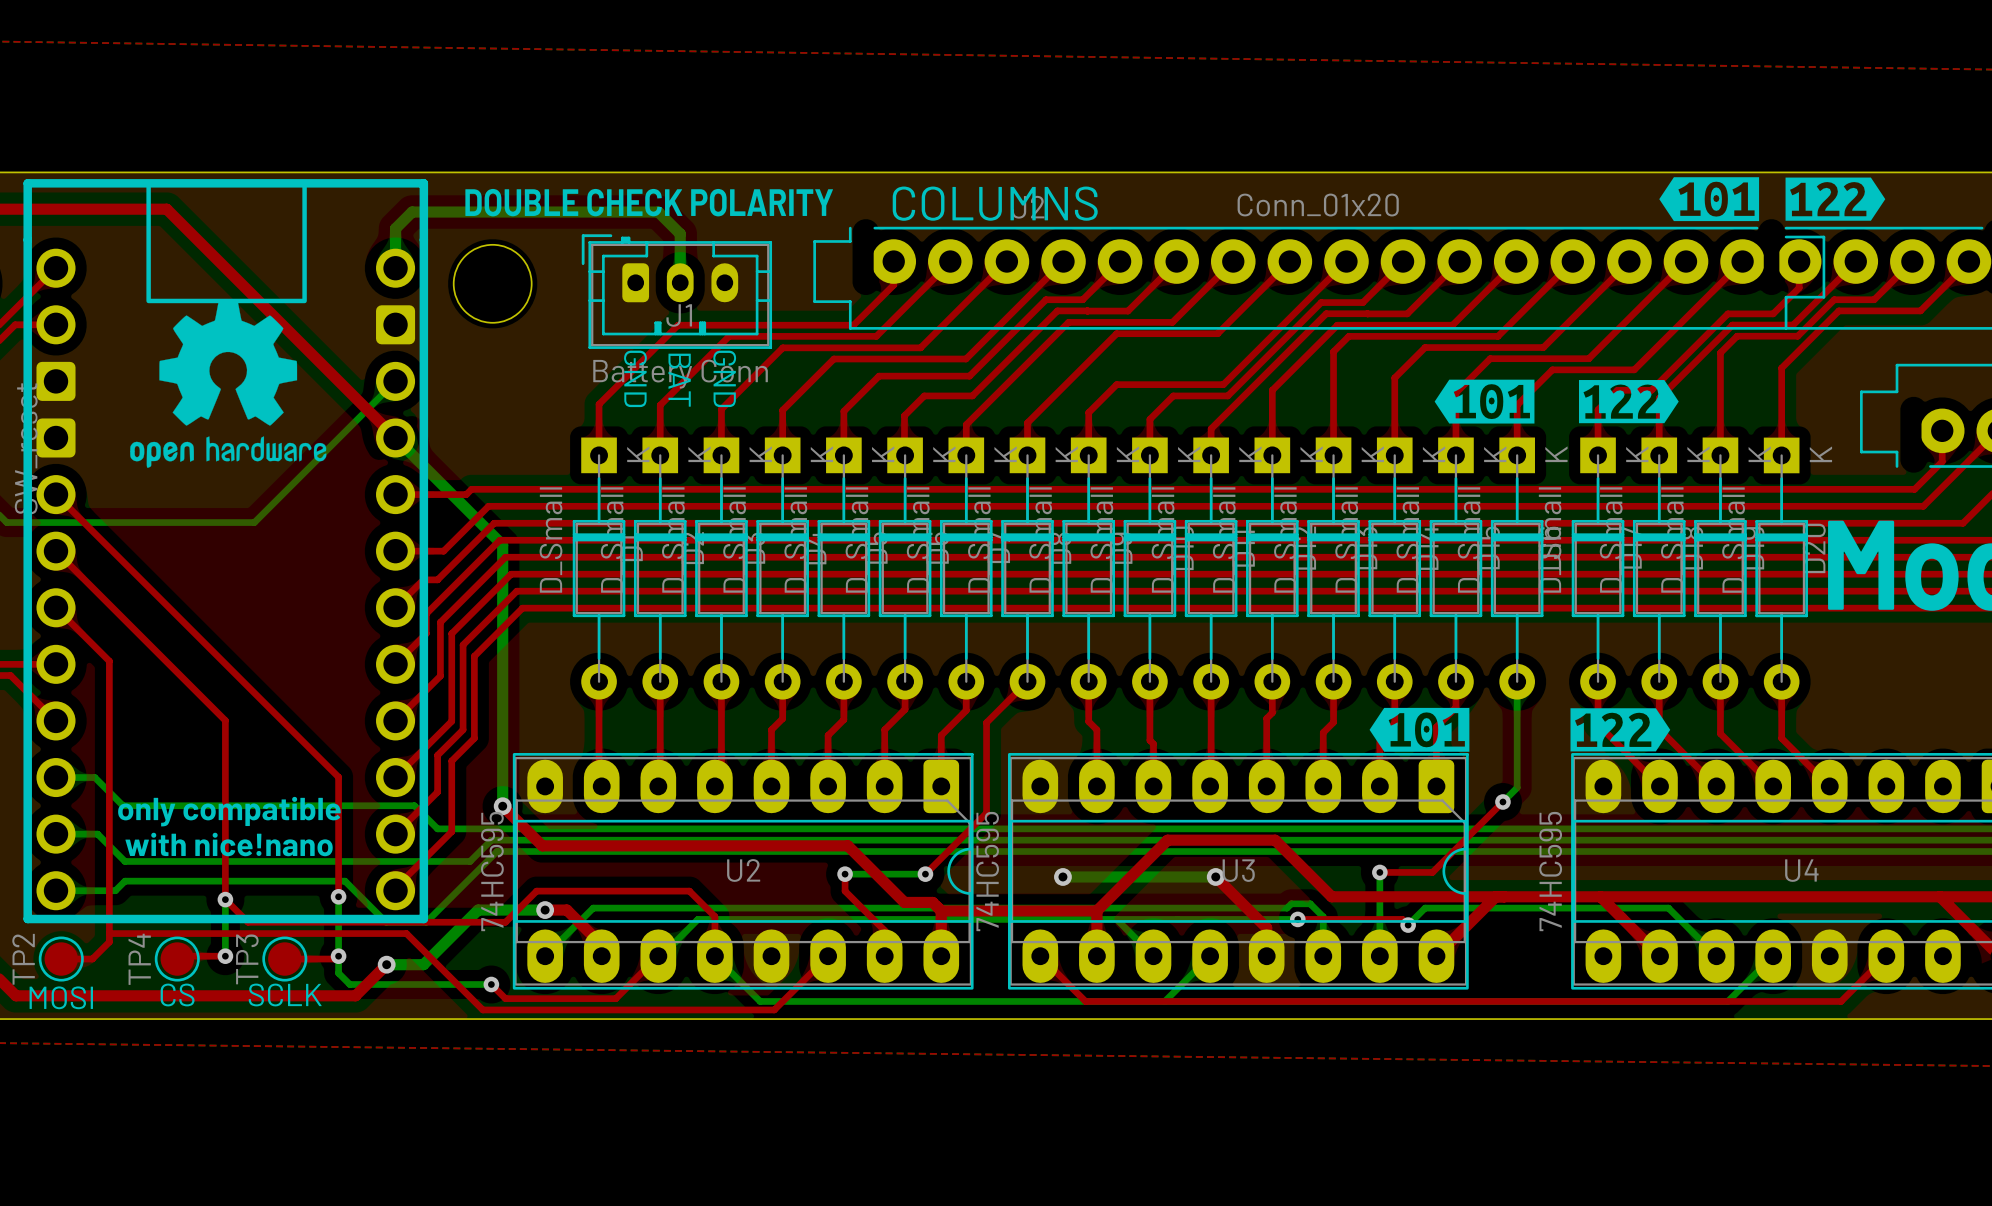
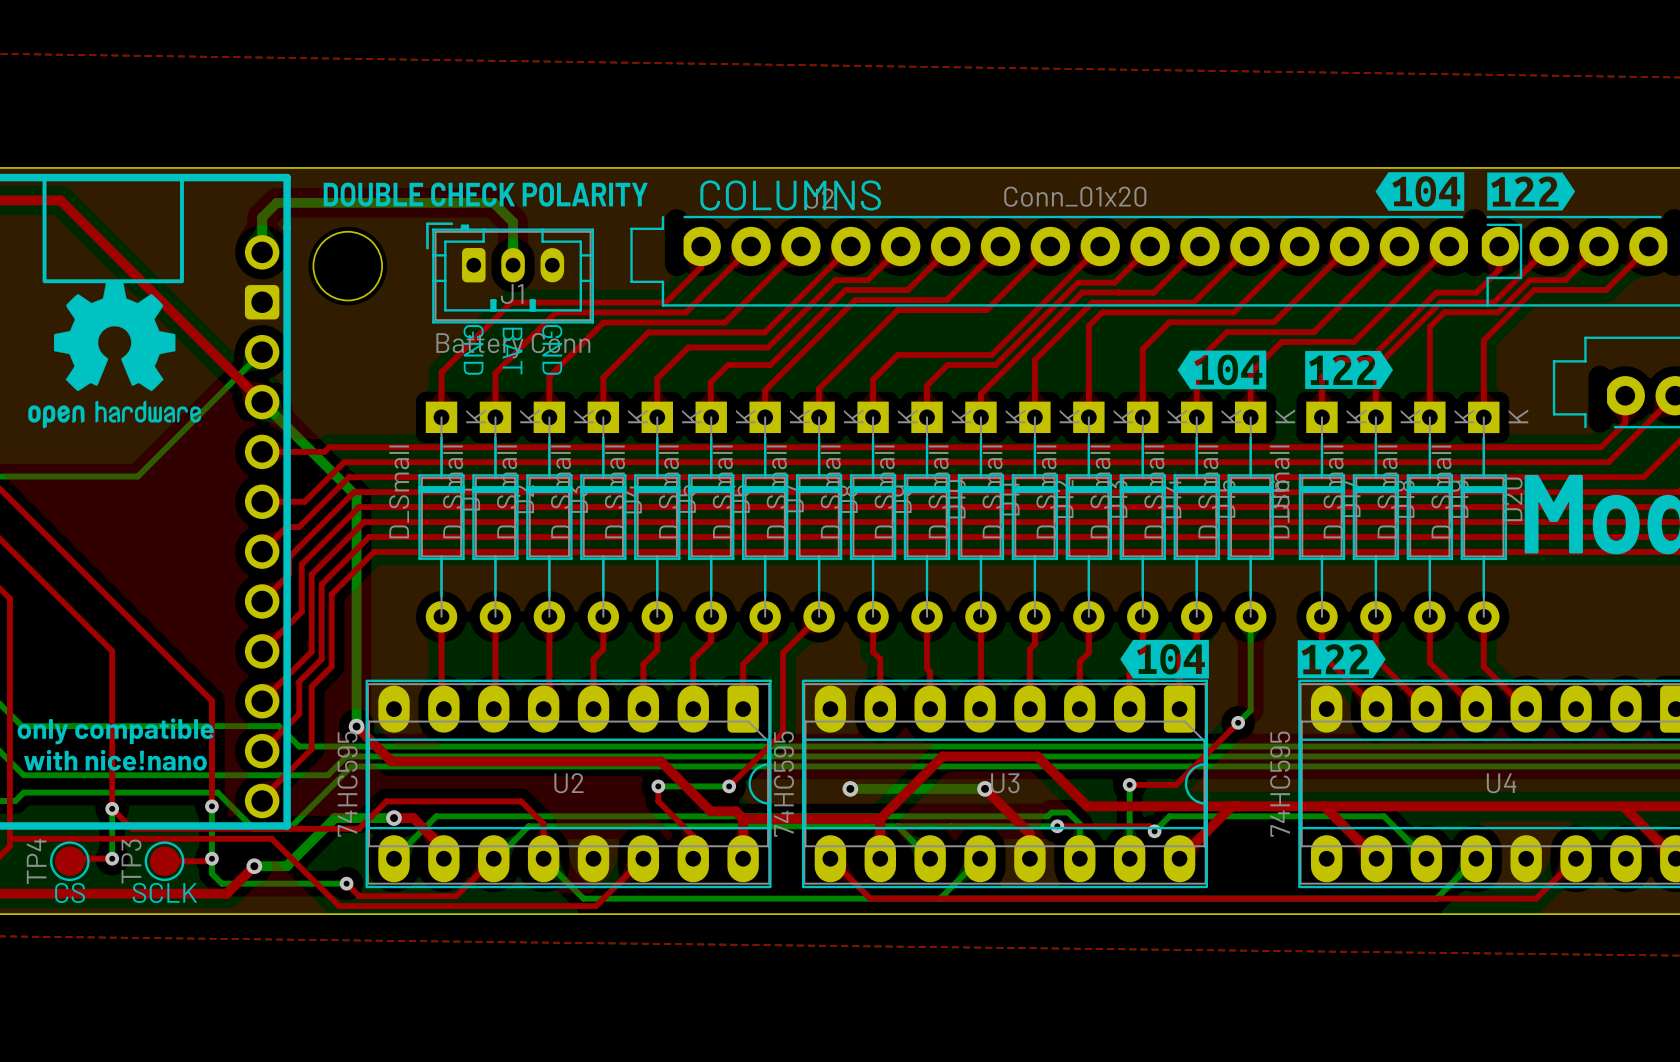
drawing shape: [1659, 177, 1760, 222] -> [1375, 172, 1465, 211]
drawing shape: [1434, 379, 1535, 424] -> [1177, 350, 1267, 390]
drawing shape: [1369, 707, 1470, 752] -> [1120, 639, 1209, 679]

